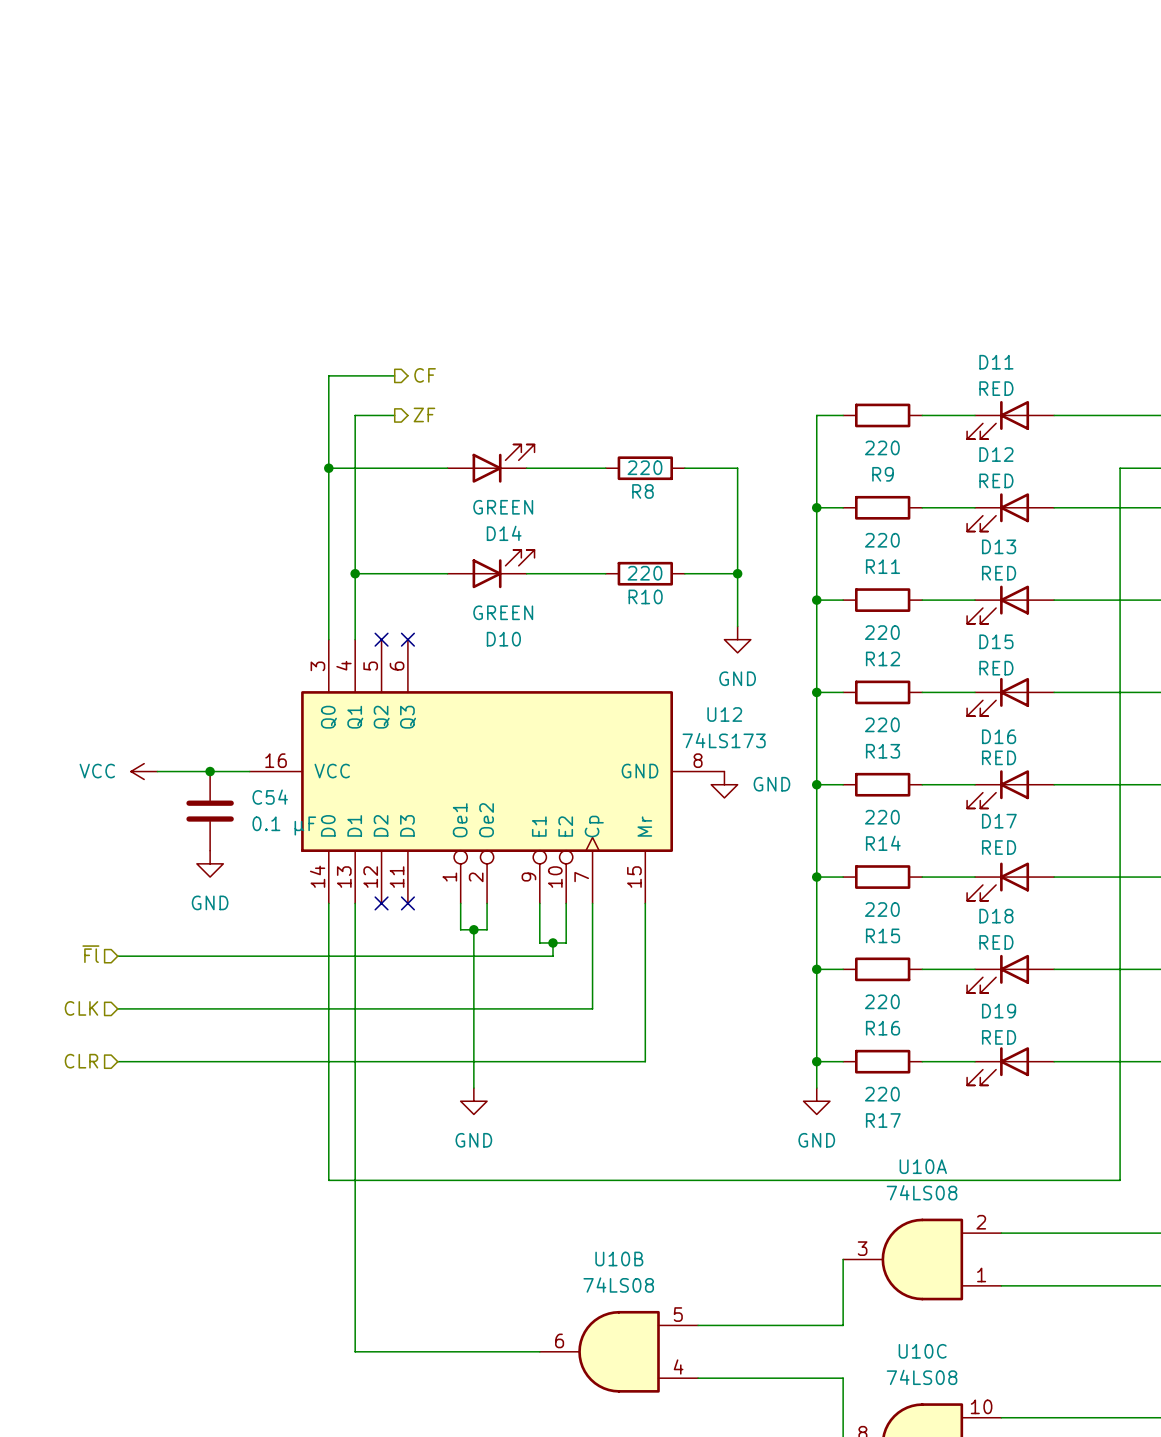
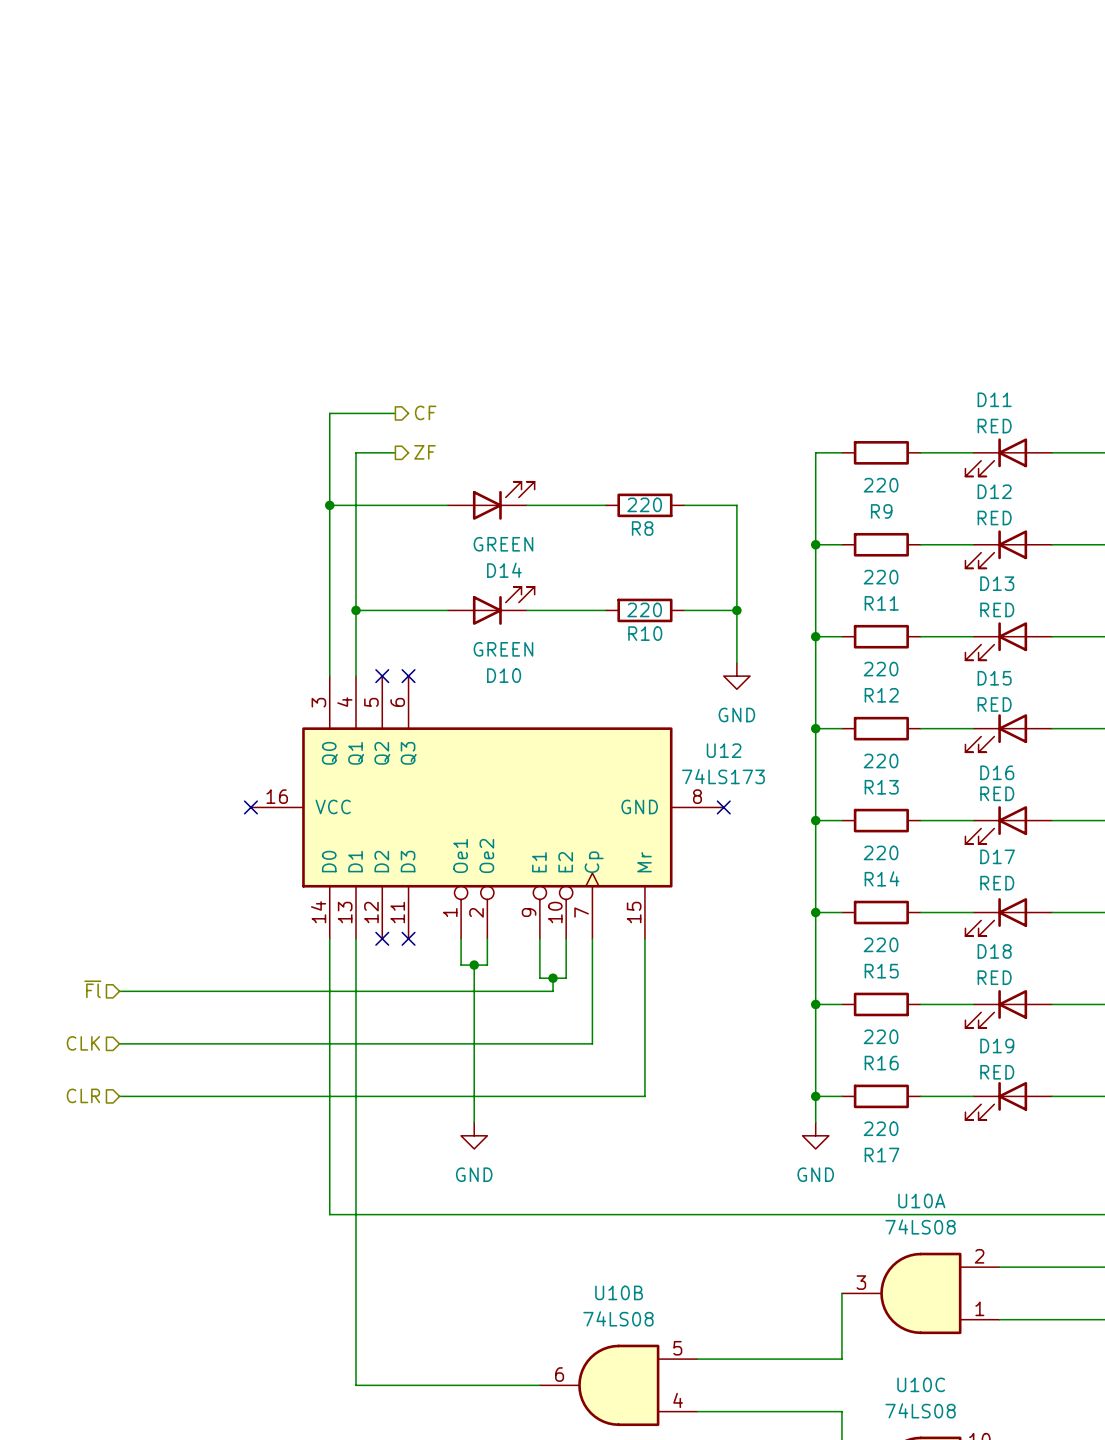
power symbol: VCC (144, 771) -> none
wire: (157, 771) (249, 771) -> none
junction: (210, 771) -> none
no-connect mark: none -> (250, 807)
no-connect mark: none -> (723, 807)
power symbol: GND (724, 784) -> none
C54: 0.1 µF (210, 811) -> none
power symbol: GND (210, 863) -> none

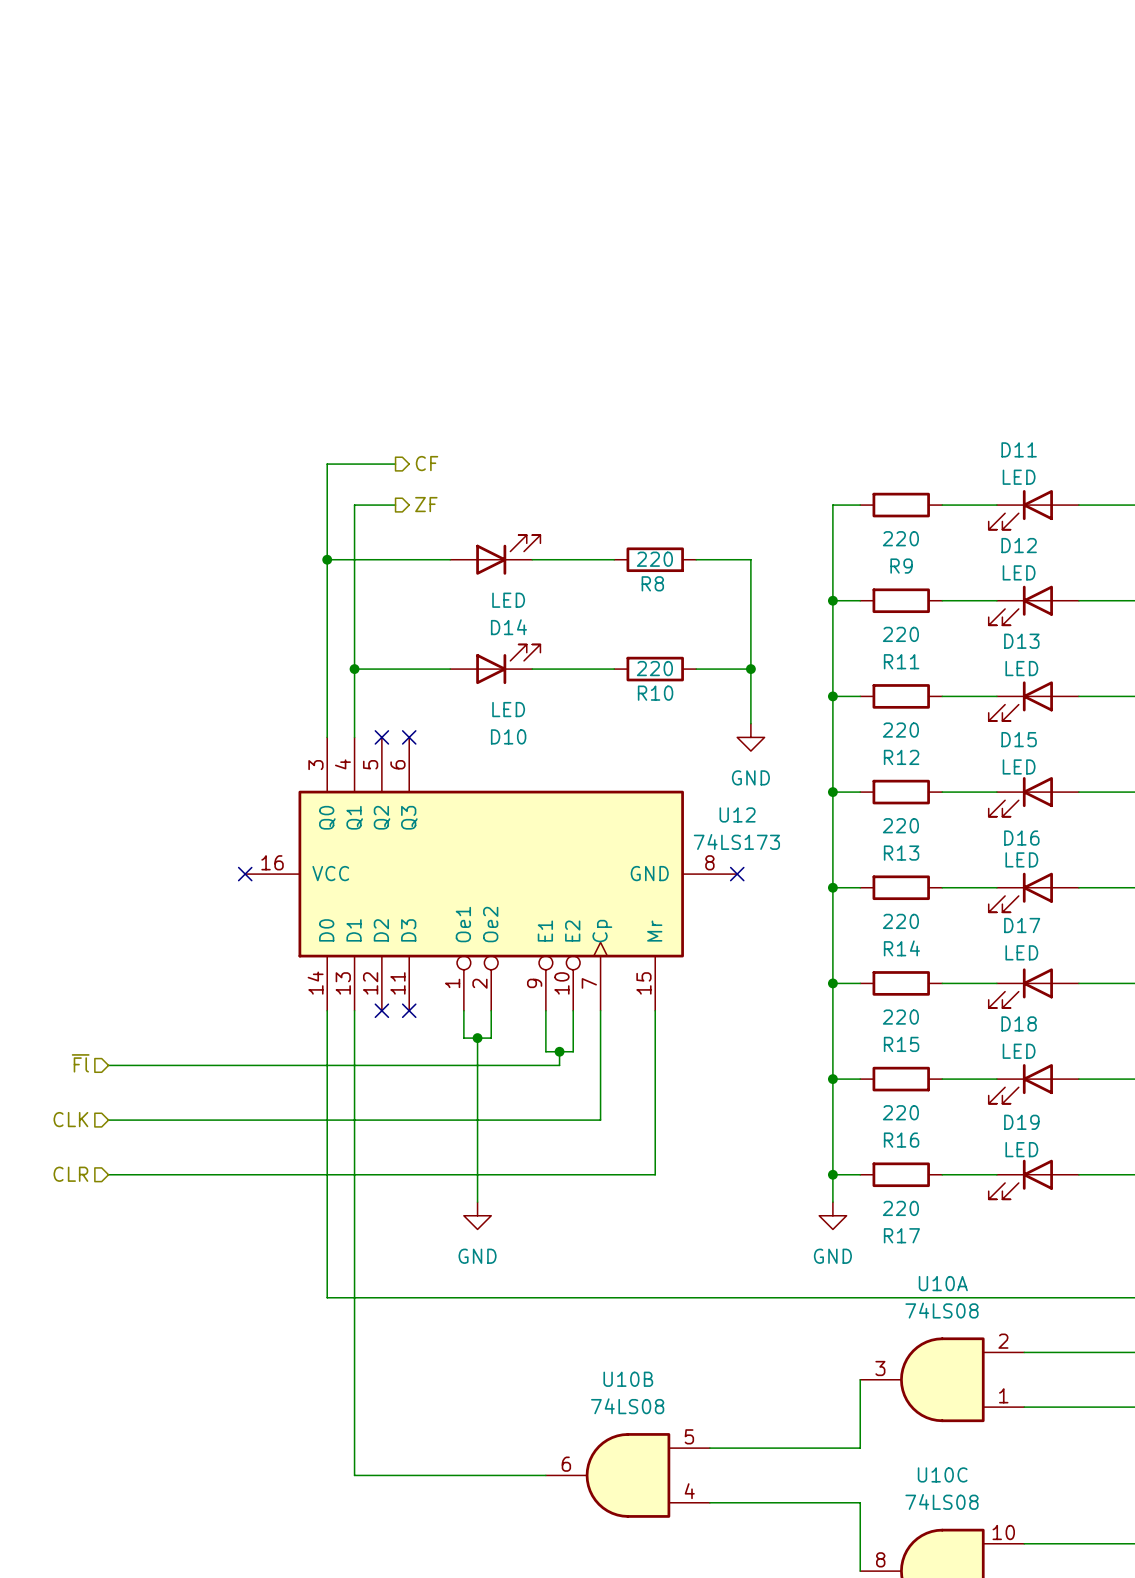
D11 value: RED (994, 426) -> LED (1019, 477)
D12 value: RED (994, 518) -> LED (1019, 572)
D14 value: GREEN (503, 544) -> LED (508, 600)
D13 value: RED (997, 609) -> LED (1021, 668)
D10 value: GREEN (503, 649) -> LED (508, 709)
D15 value: RED (994, 704) -> LED (1019, 766)
D16 value: RED (997, 793) -> LED (1021, 859)
D17 value: RED (997, 883) -> LED (1021, 952)
D18 value: RED (994, 977) -> LED (1019, 1051)
D19 value: RED (997, 1072) -> LED (1021, 1149)

